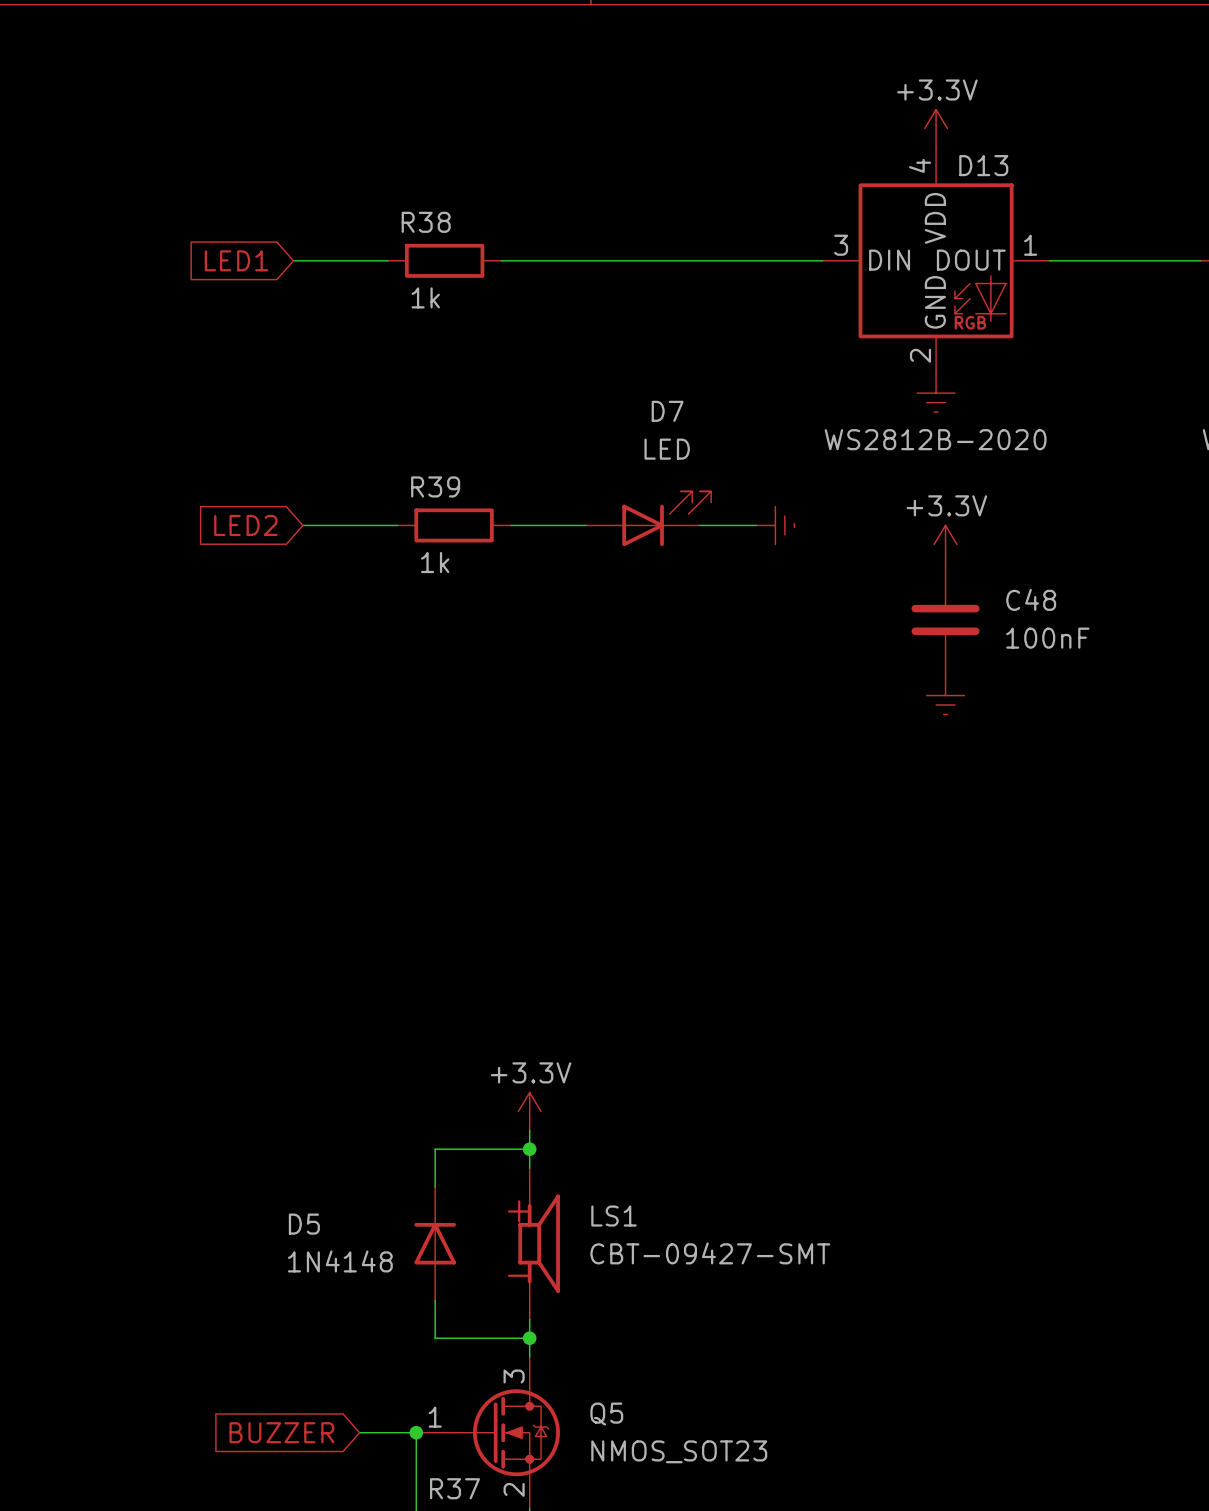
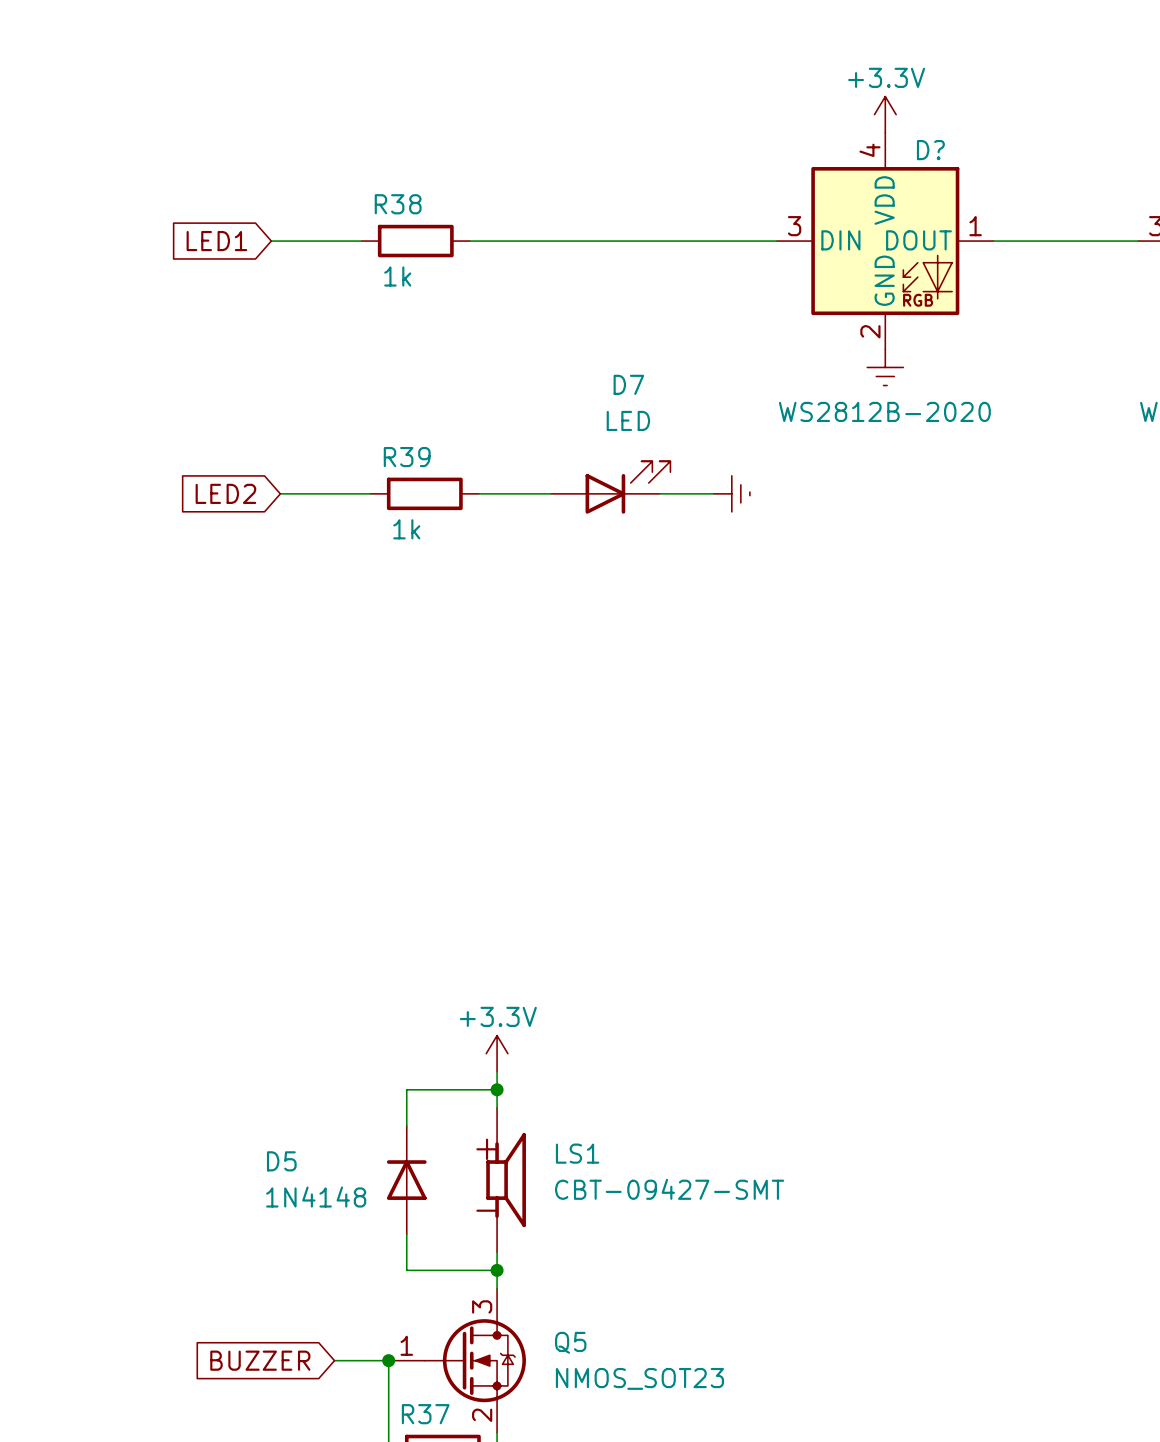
D13 name: D13 (983, 165) -> D? (930, 150)
power symbol: +3.3V (945, 544) -> none
C48: 100nF (945, 619) -> none
power symbol: (945, 695) -> none

